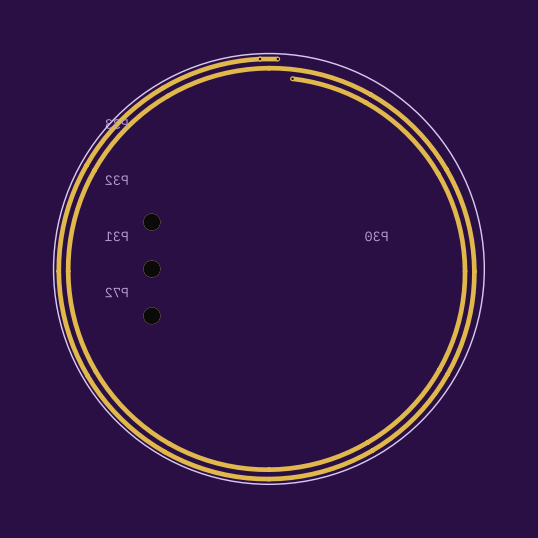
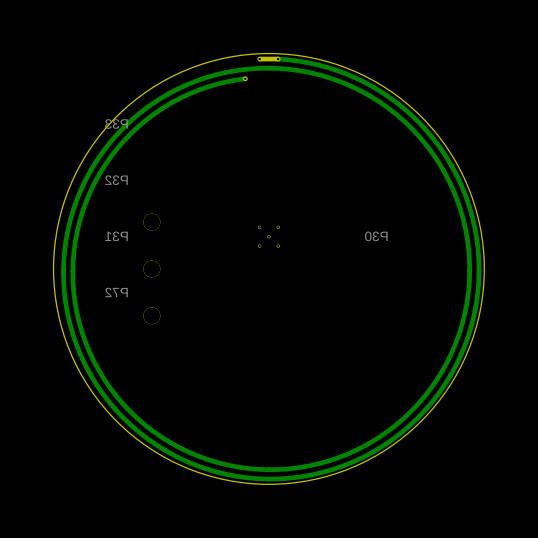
part footprint: [53, 53, 485, 485] -> [53, 53, 485, 485]
part: none -> (268, 236)

